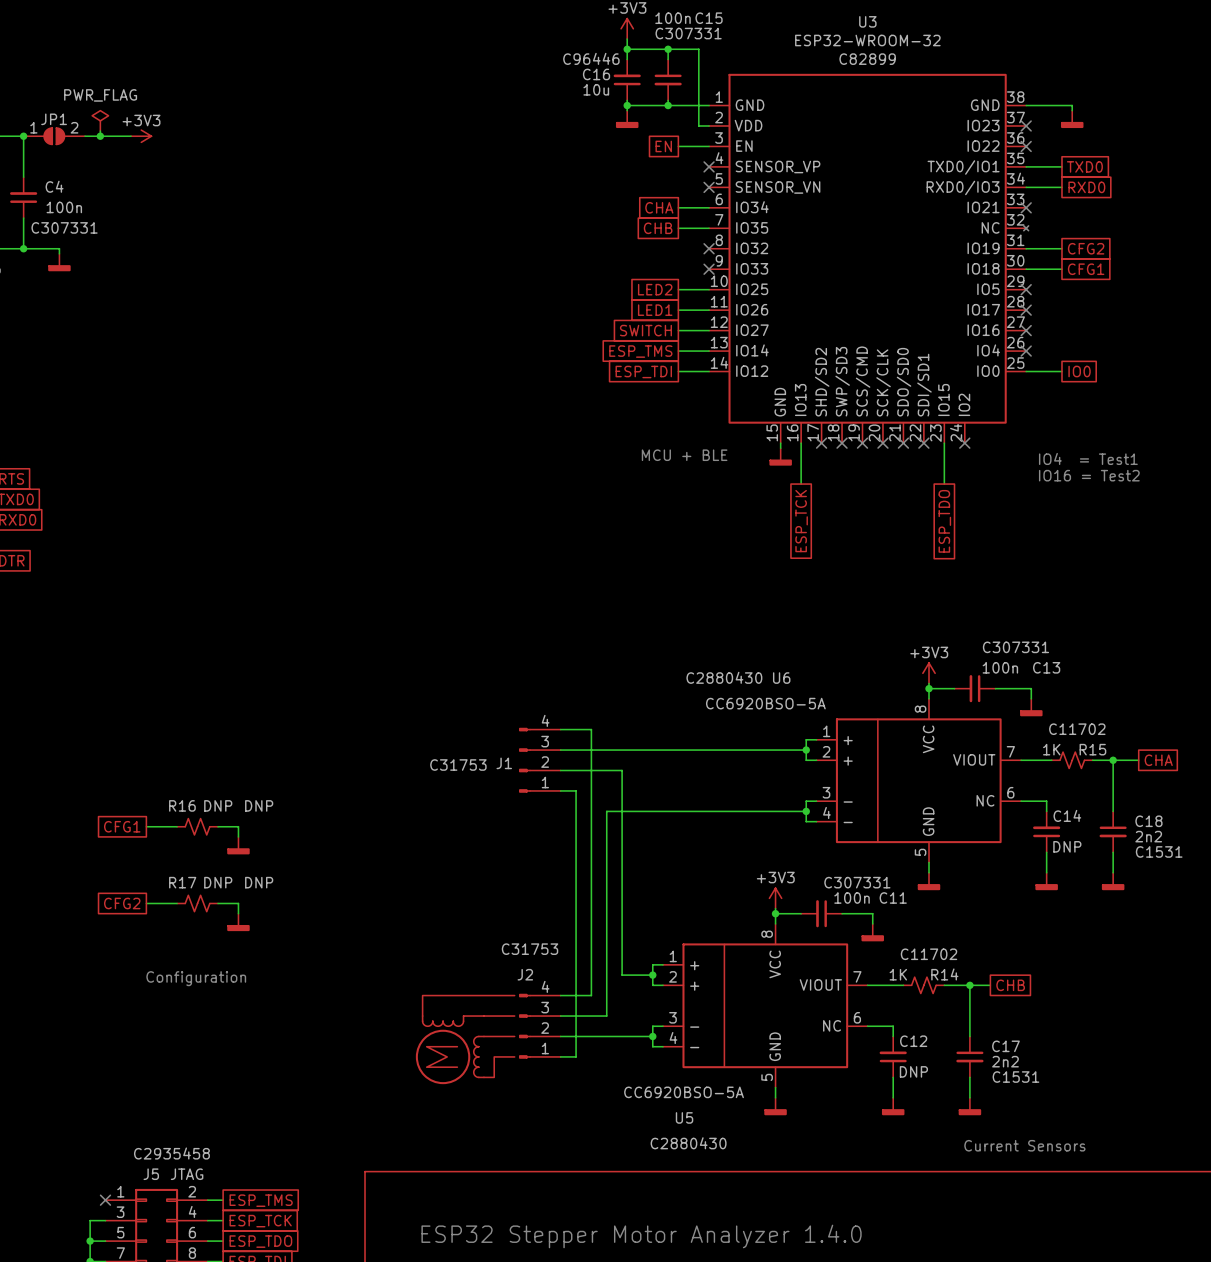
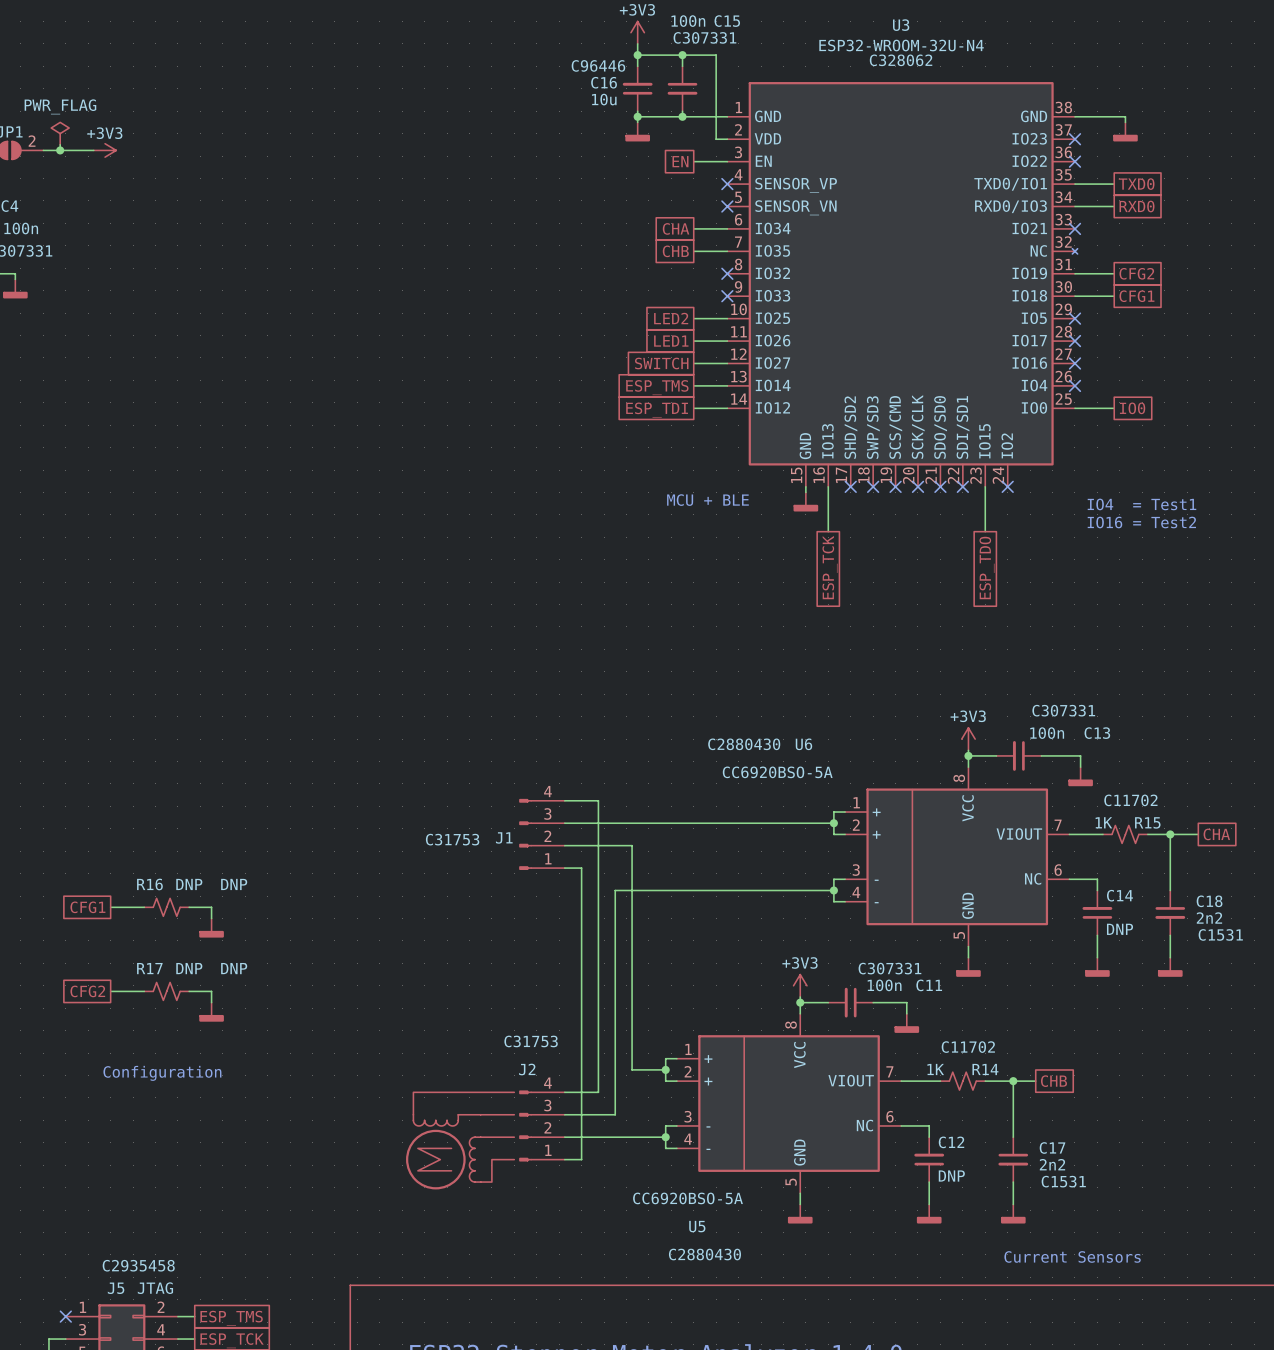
U3 value: ESP32-WROOM-32 (867, 40) -> ESP32-WROOM-32U-N4 (901, 45)
U3 text: C82899 (867, 59) -> C328062 (901, 60)

